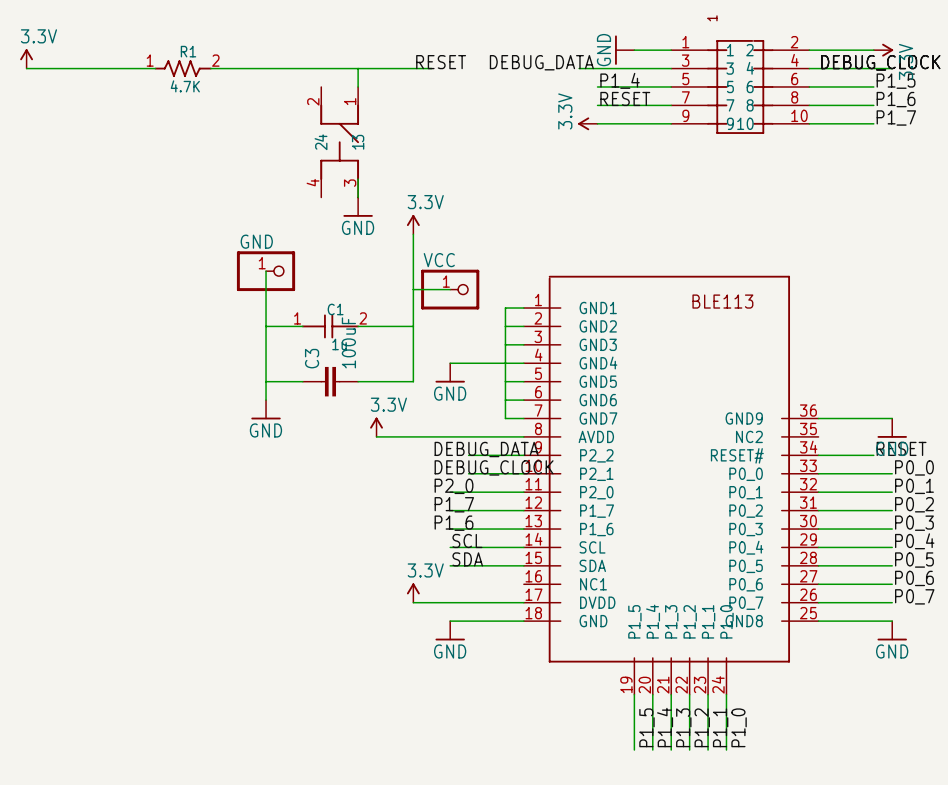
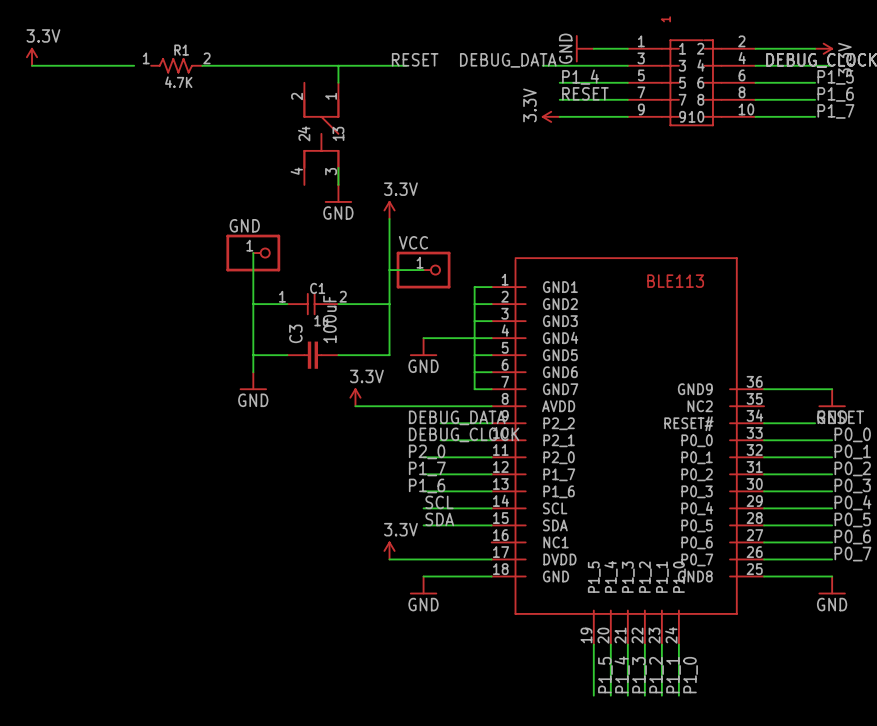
wire: (137, 68) (155, 68) -> none

